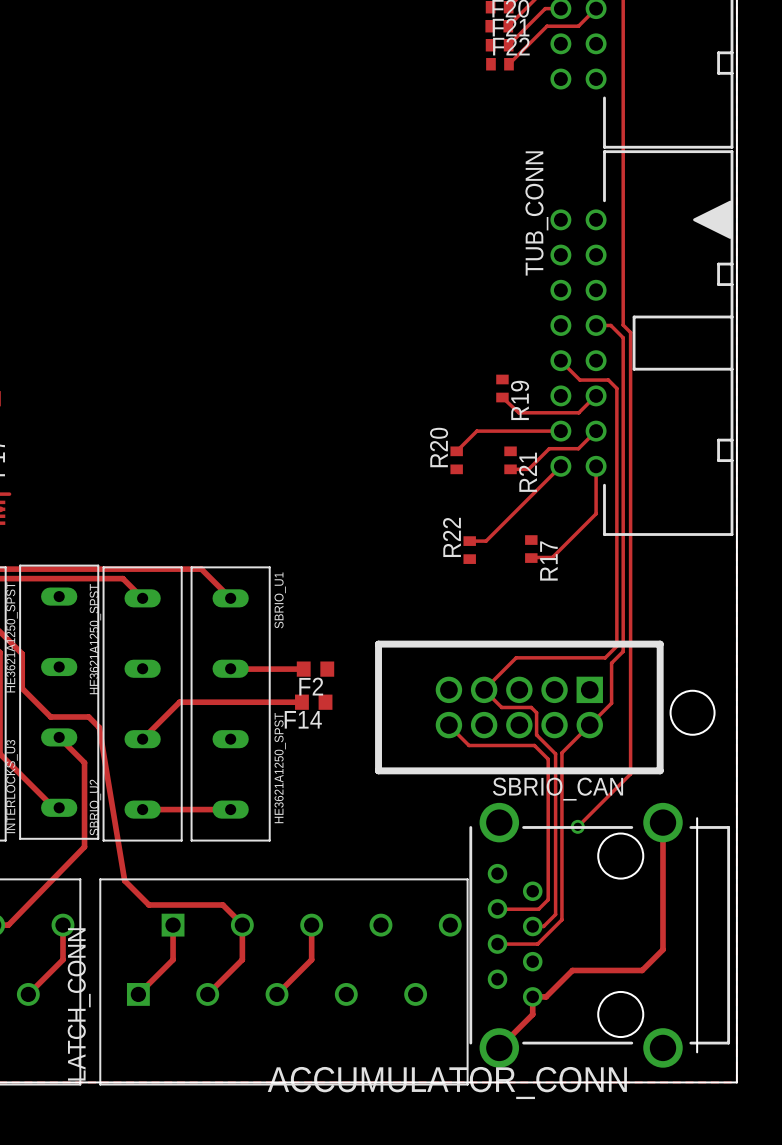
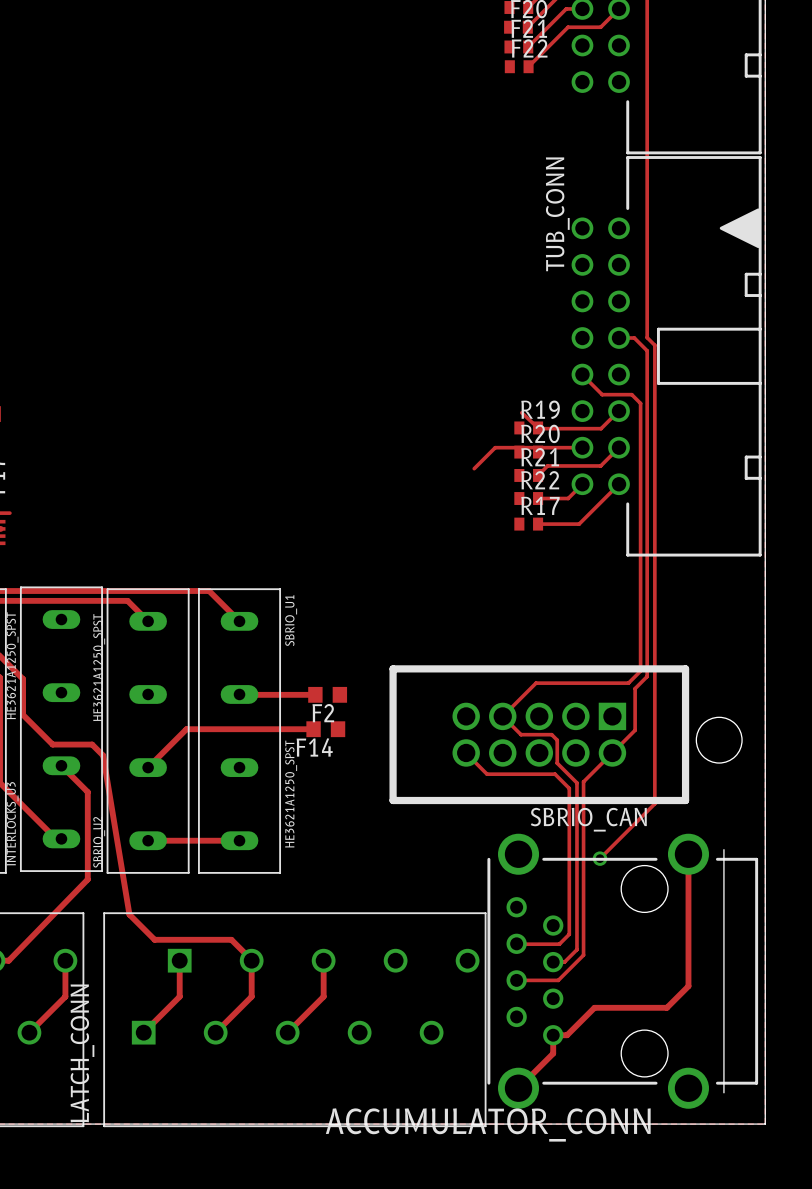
R19 rotation: 0° (502, 388) -> 90° clockwise (528, 427)
R19 position: (502, 388) -> (528, 427)
R19 name position: R19 (520, 400) -> R19 (540, 409)
track: (549, 448) (528, 469) (510, 469) -> (570, 465) (547, 465) (538, 475)
R20 rotation: 0° (456, 460) -> 90° clockwise (528, 452)
R20 position: (456, 460) -> (528, 452)
R21 rotation: 0° (510, 460) -> 90° clockwise (528, 475)
track: (596, 466) (596, 513) (552, 557) (531, 558) -> (619, 484) (579, 524) (538, 524)
R21 name position: R21 (528, 472) -> R21 (540, 457)
track: (547, 480) (486, 541) (469, 541) -> (568, 498) (538, 498)
R17 rotation: 0° (531, 549) -> 90° clockwise (528, 524)
R17 position: (531, 549) -> (528, 524)
R22 rotation: 0° (469, 550) -> 90° clockwise (528, 498)
R22 position: (469, 550) -> (528, 498)
R17 name position: R17 (548, 561) -> R17 (540, 505)

